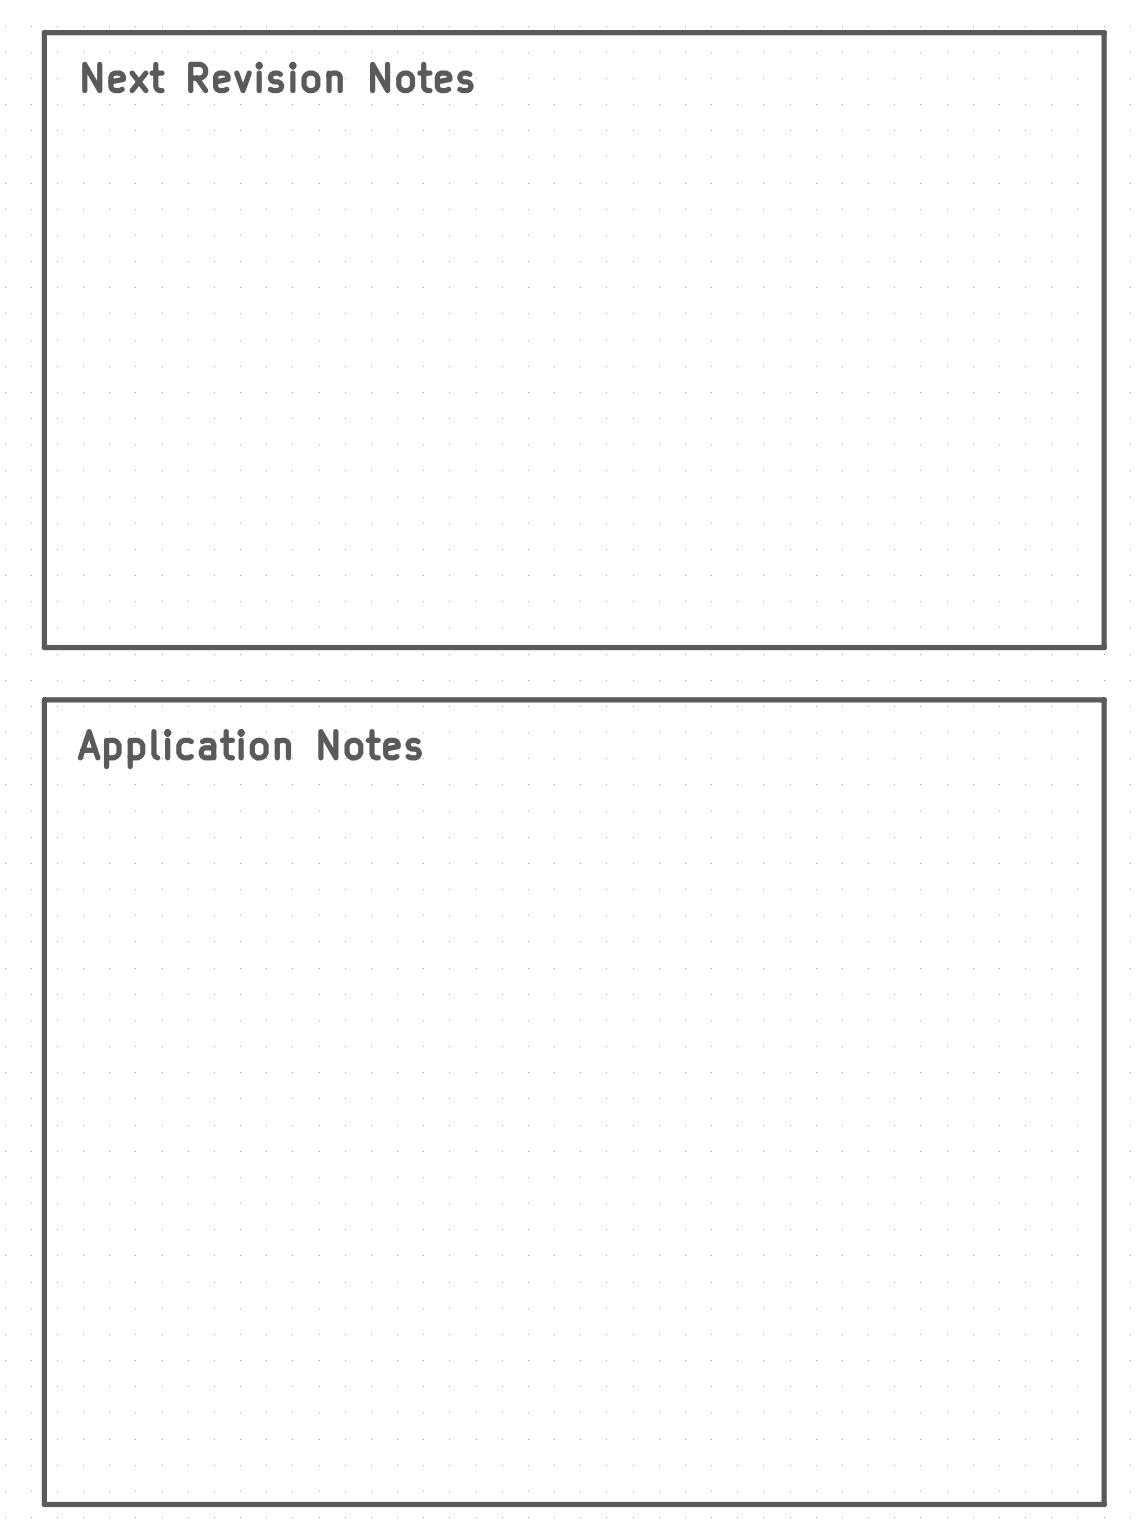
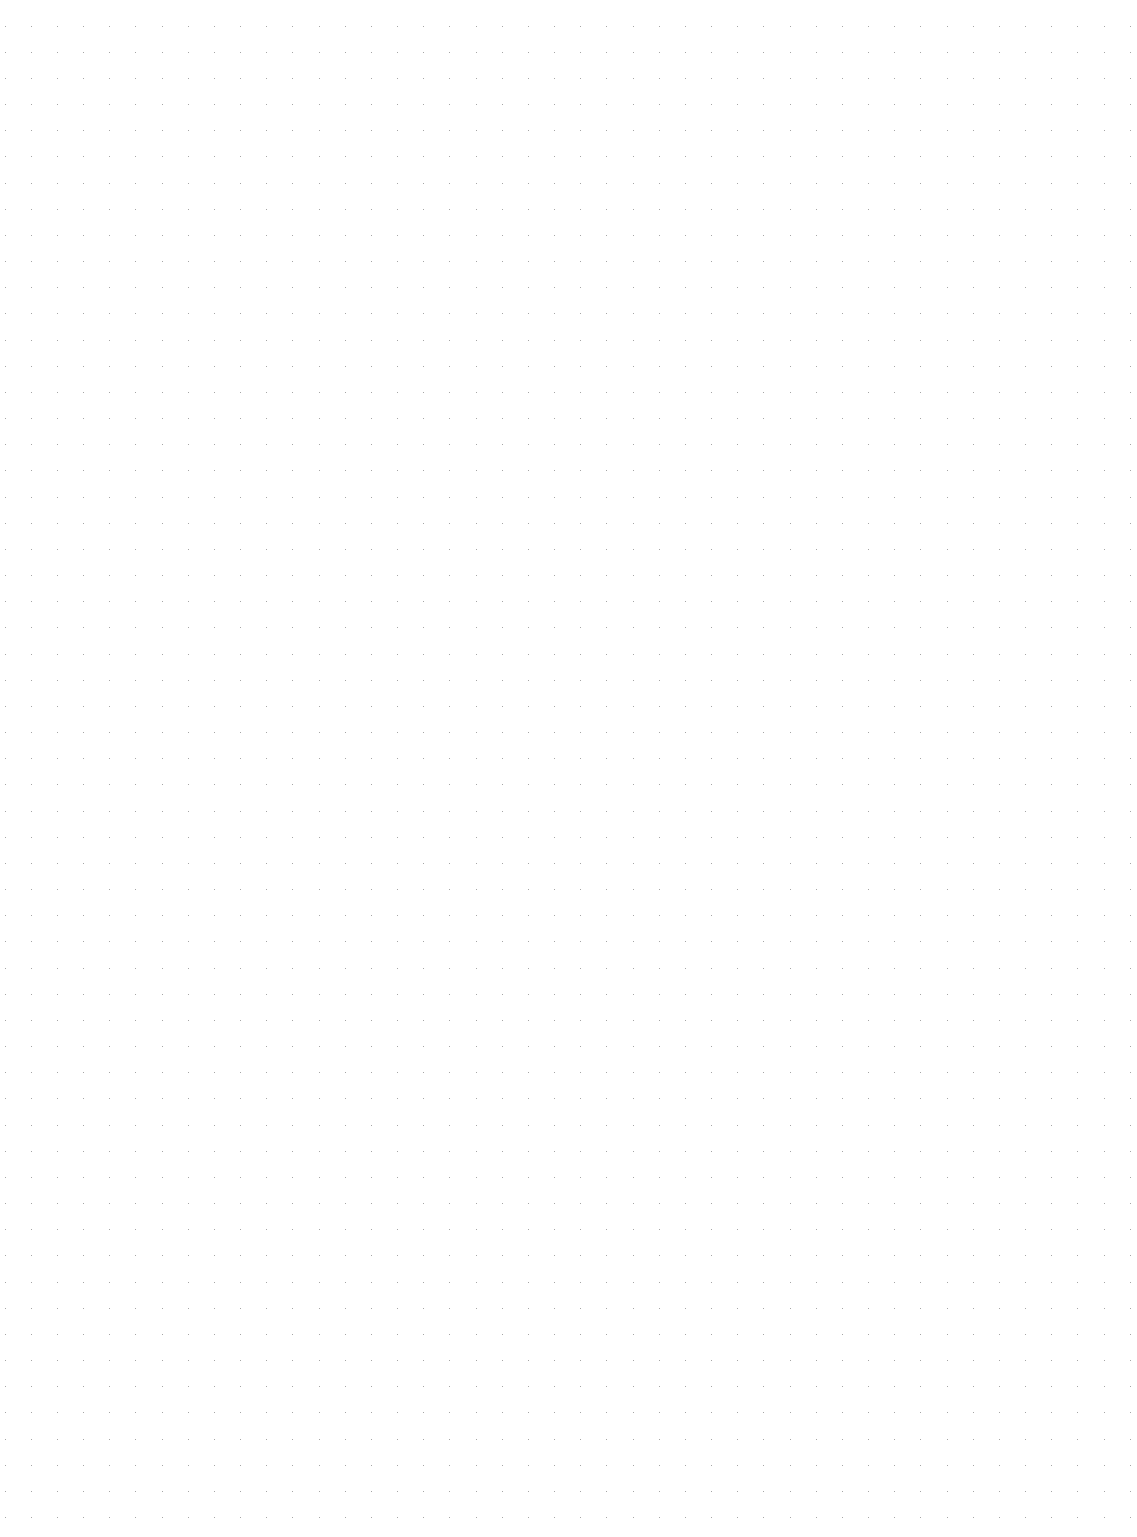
line: (44, 32) (1104, 32) (1104, 647) (44, 647) (44, 32) -> none
text: Next Revision Notes (277, 77) -> none
line: (44, 699) (44, 1504) (1104, 1504) (1104, 699) (44, 699) -> none
text: Application Notes (249, 749) -> none

